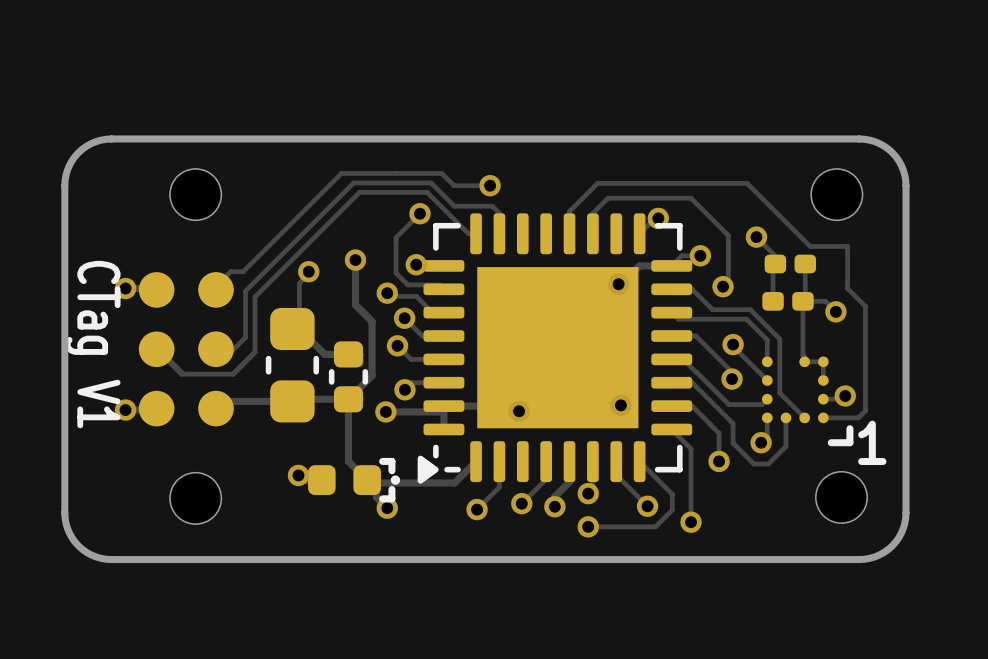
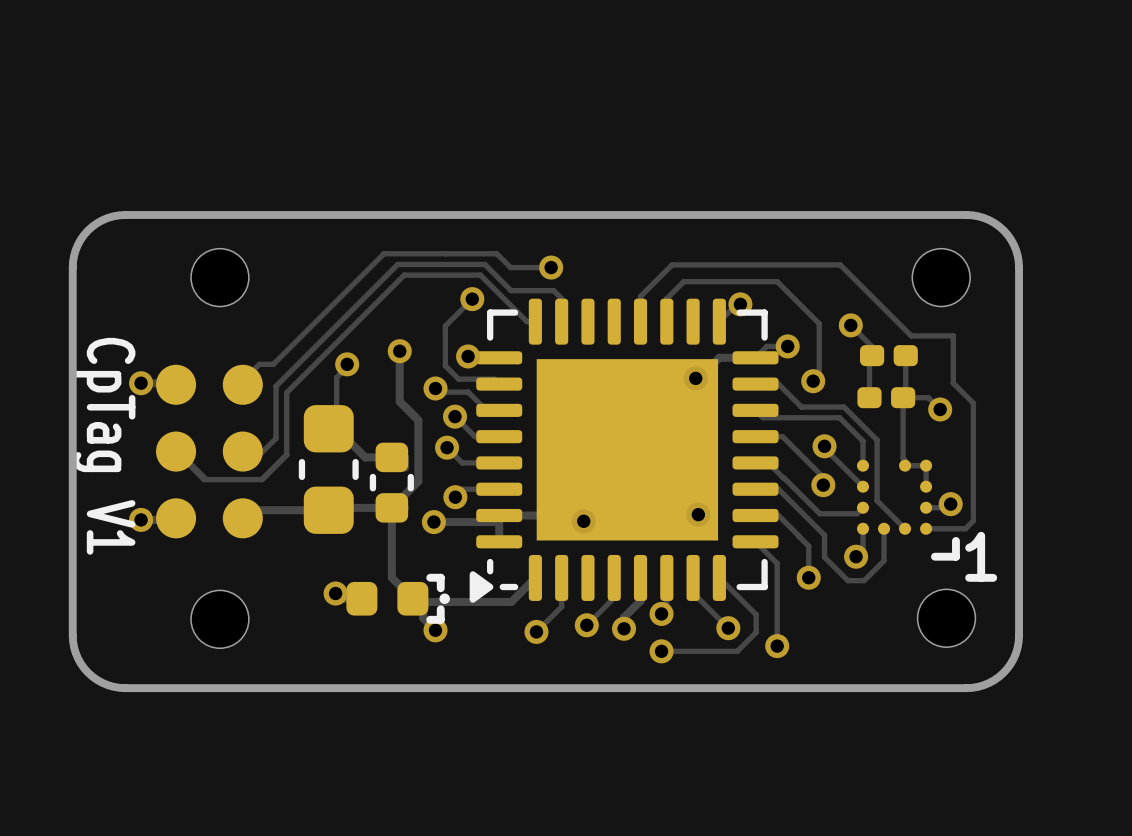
text: CTag V1 (92, 344) -> CpTag V1 (104, 446)

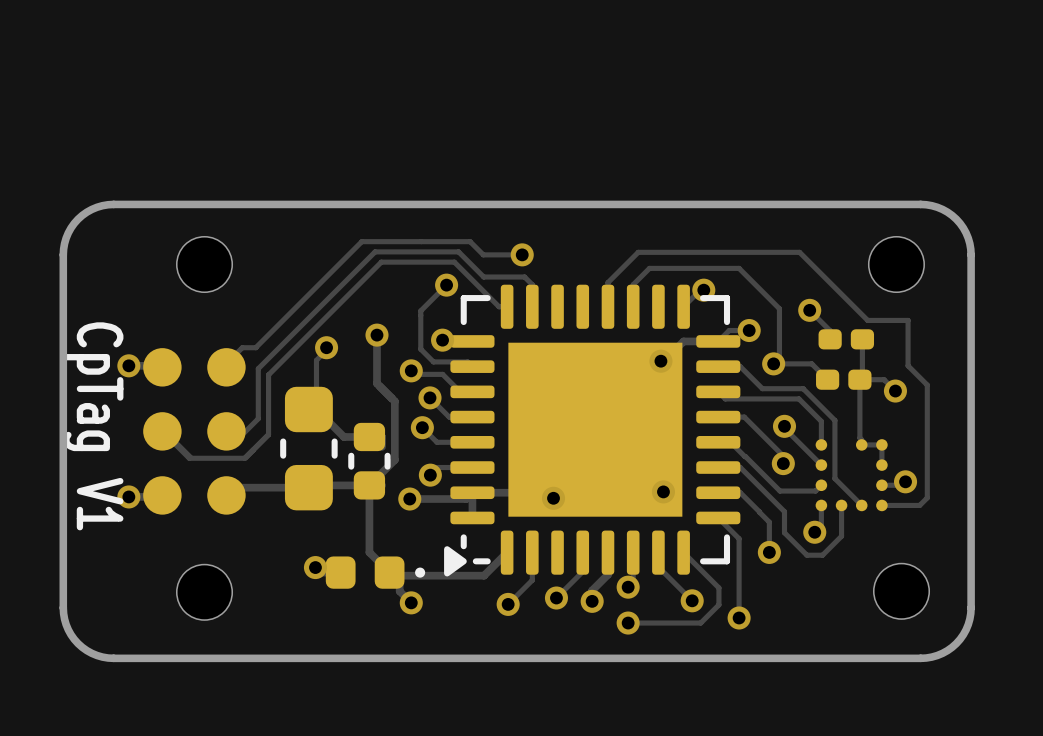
track: (872, 355) (869, 358) (869, 397) -> (773, 363) (811, 363) (827, 379)
line: (955, 540) (955, 556) (934, 556) -> none
text: 1 (981, 556) -> none
line: (430, 577) (440, 577) (440, 588) -> none
line: (440, 609) (440, 619) (430, 619) -> none

